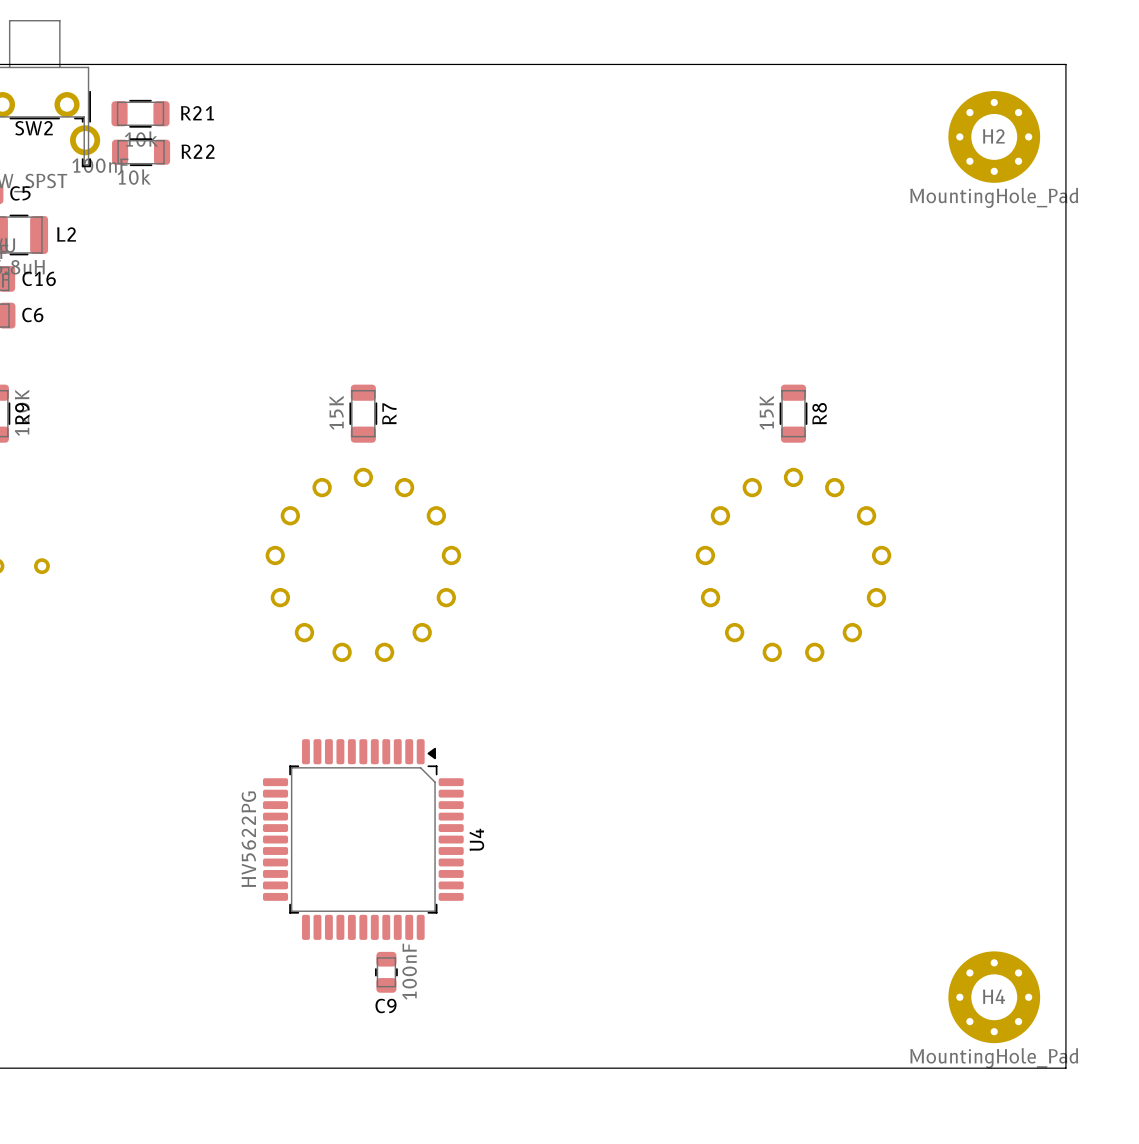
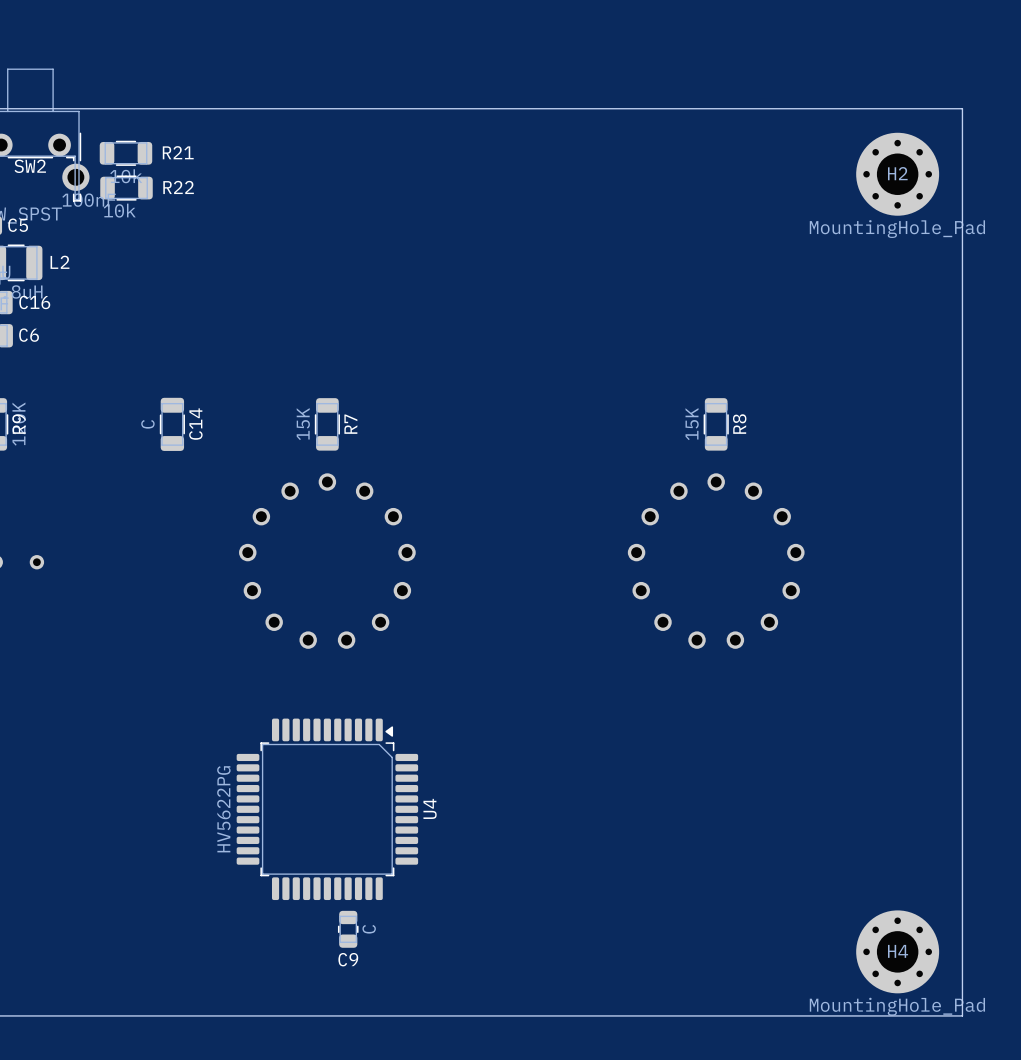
C14: none -> C (172, 424)
C9 value: 100nF (409, 971) -> C (369, 929)

